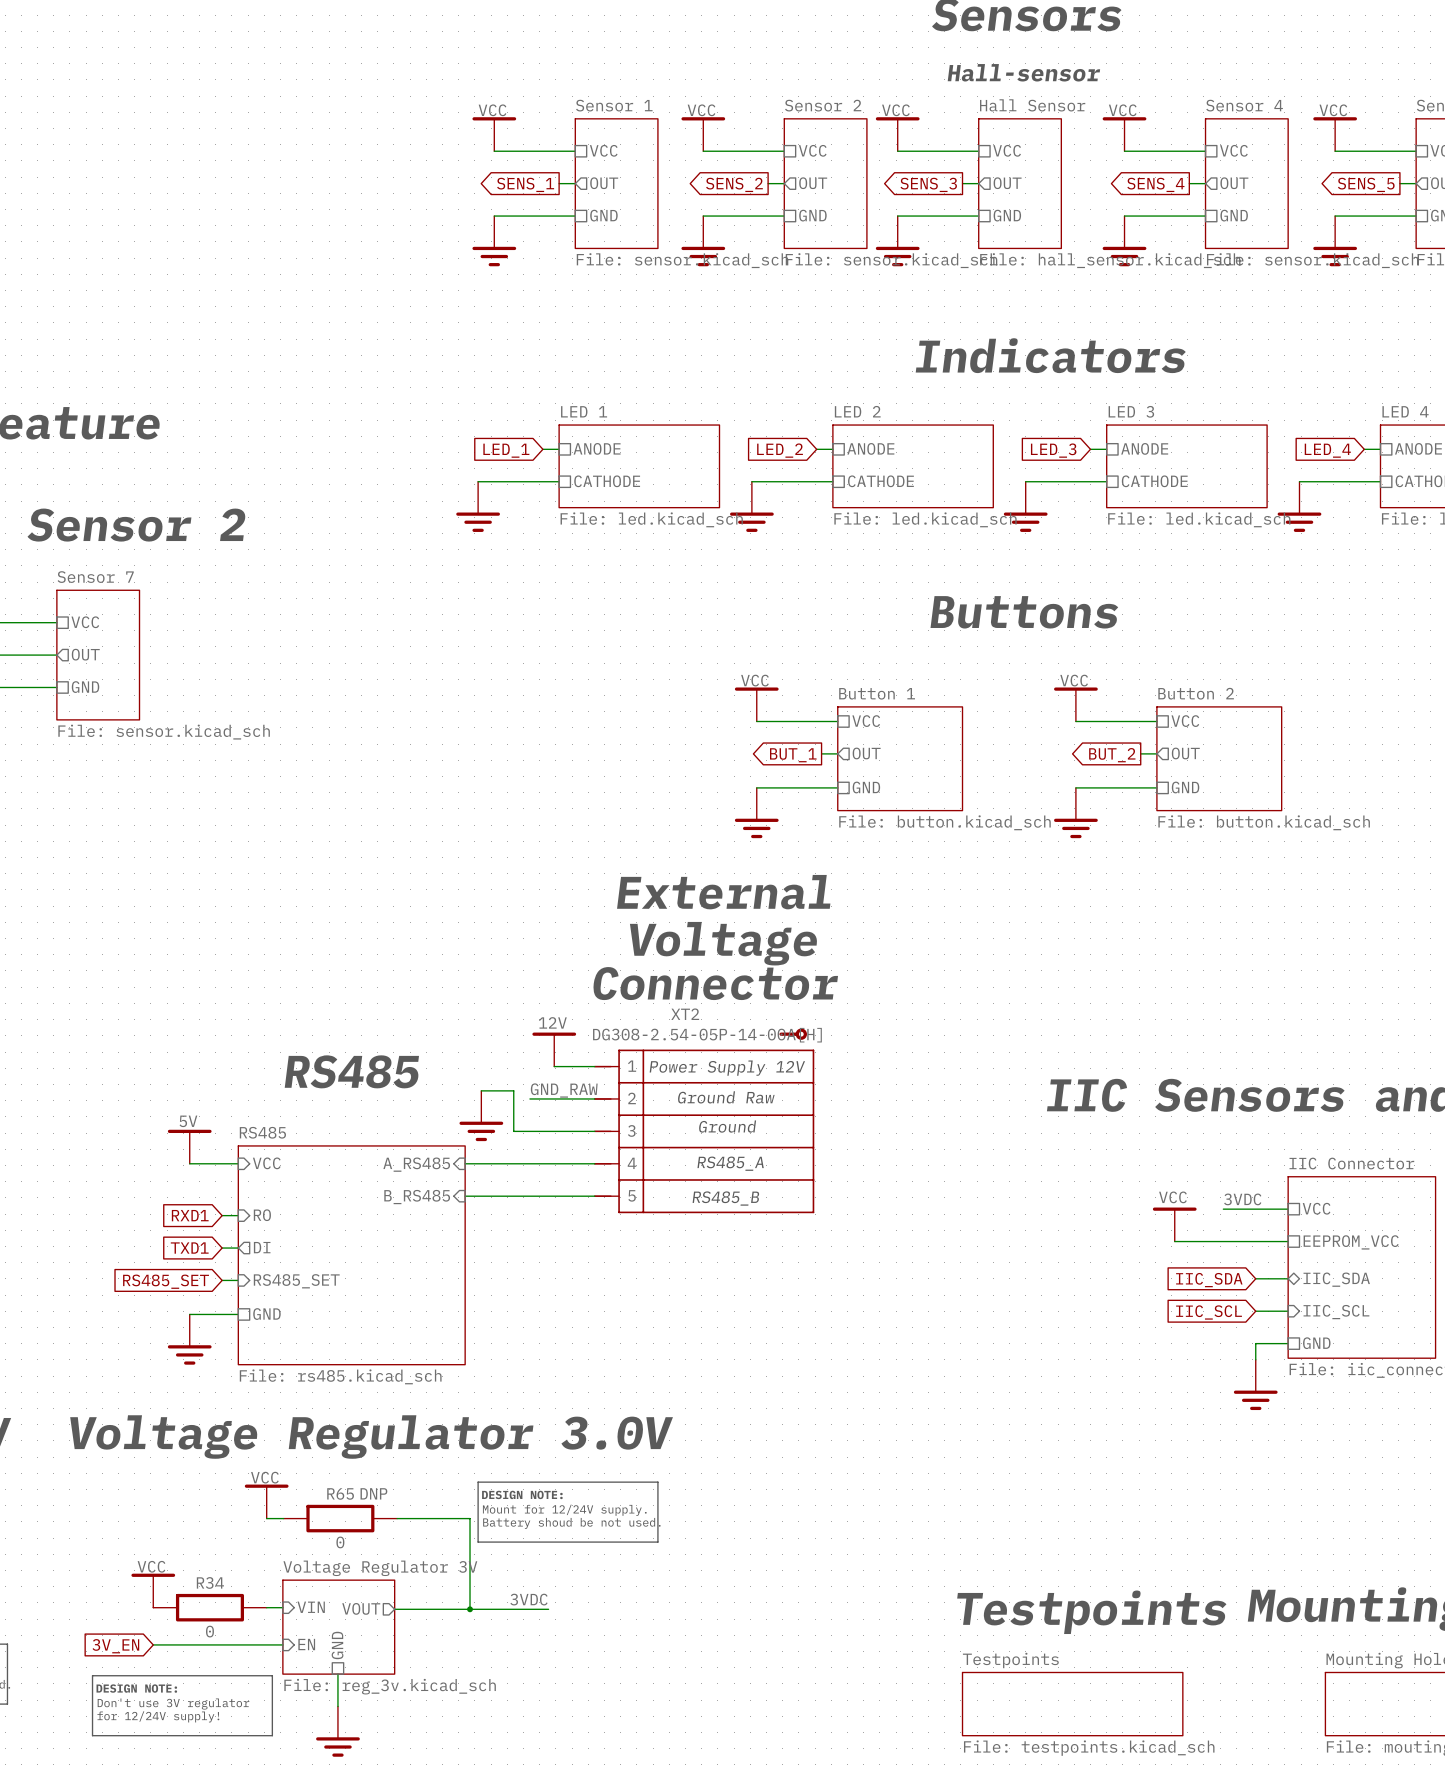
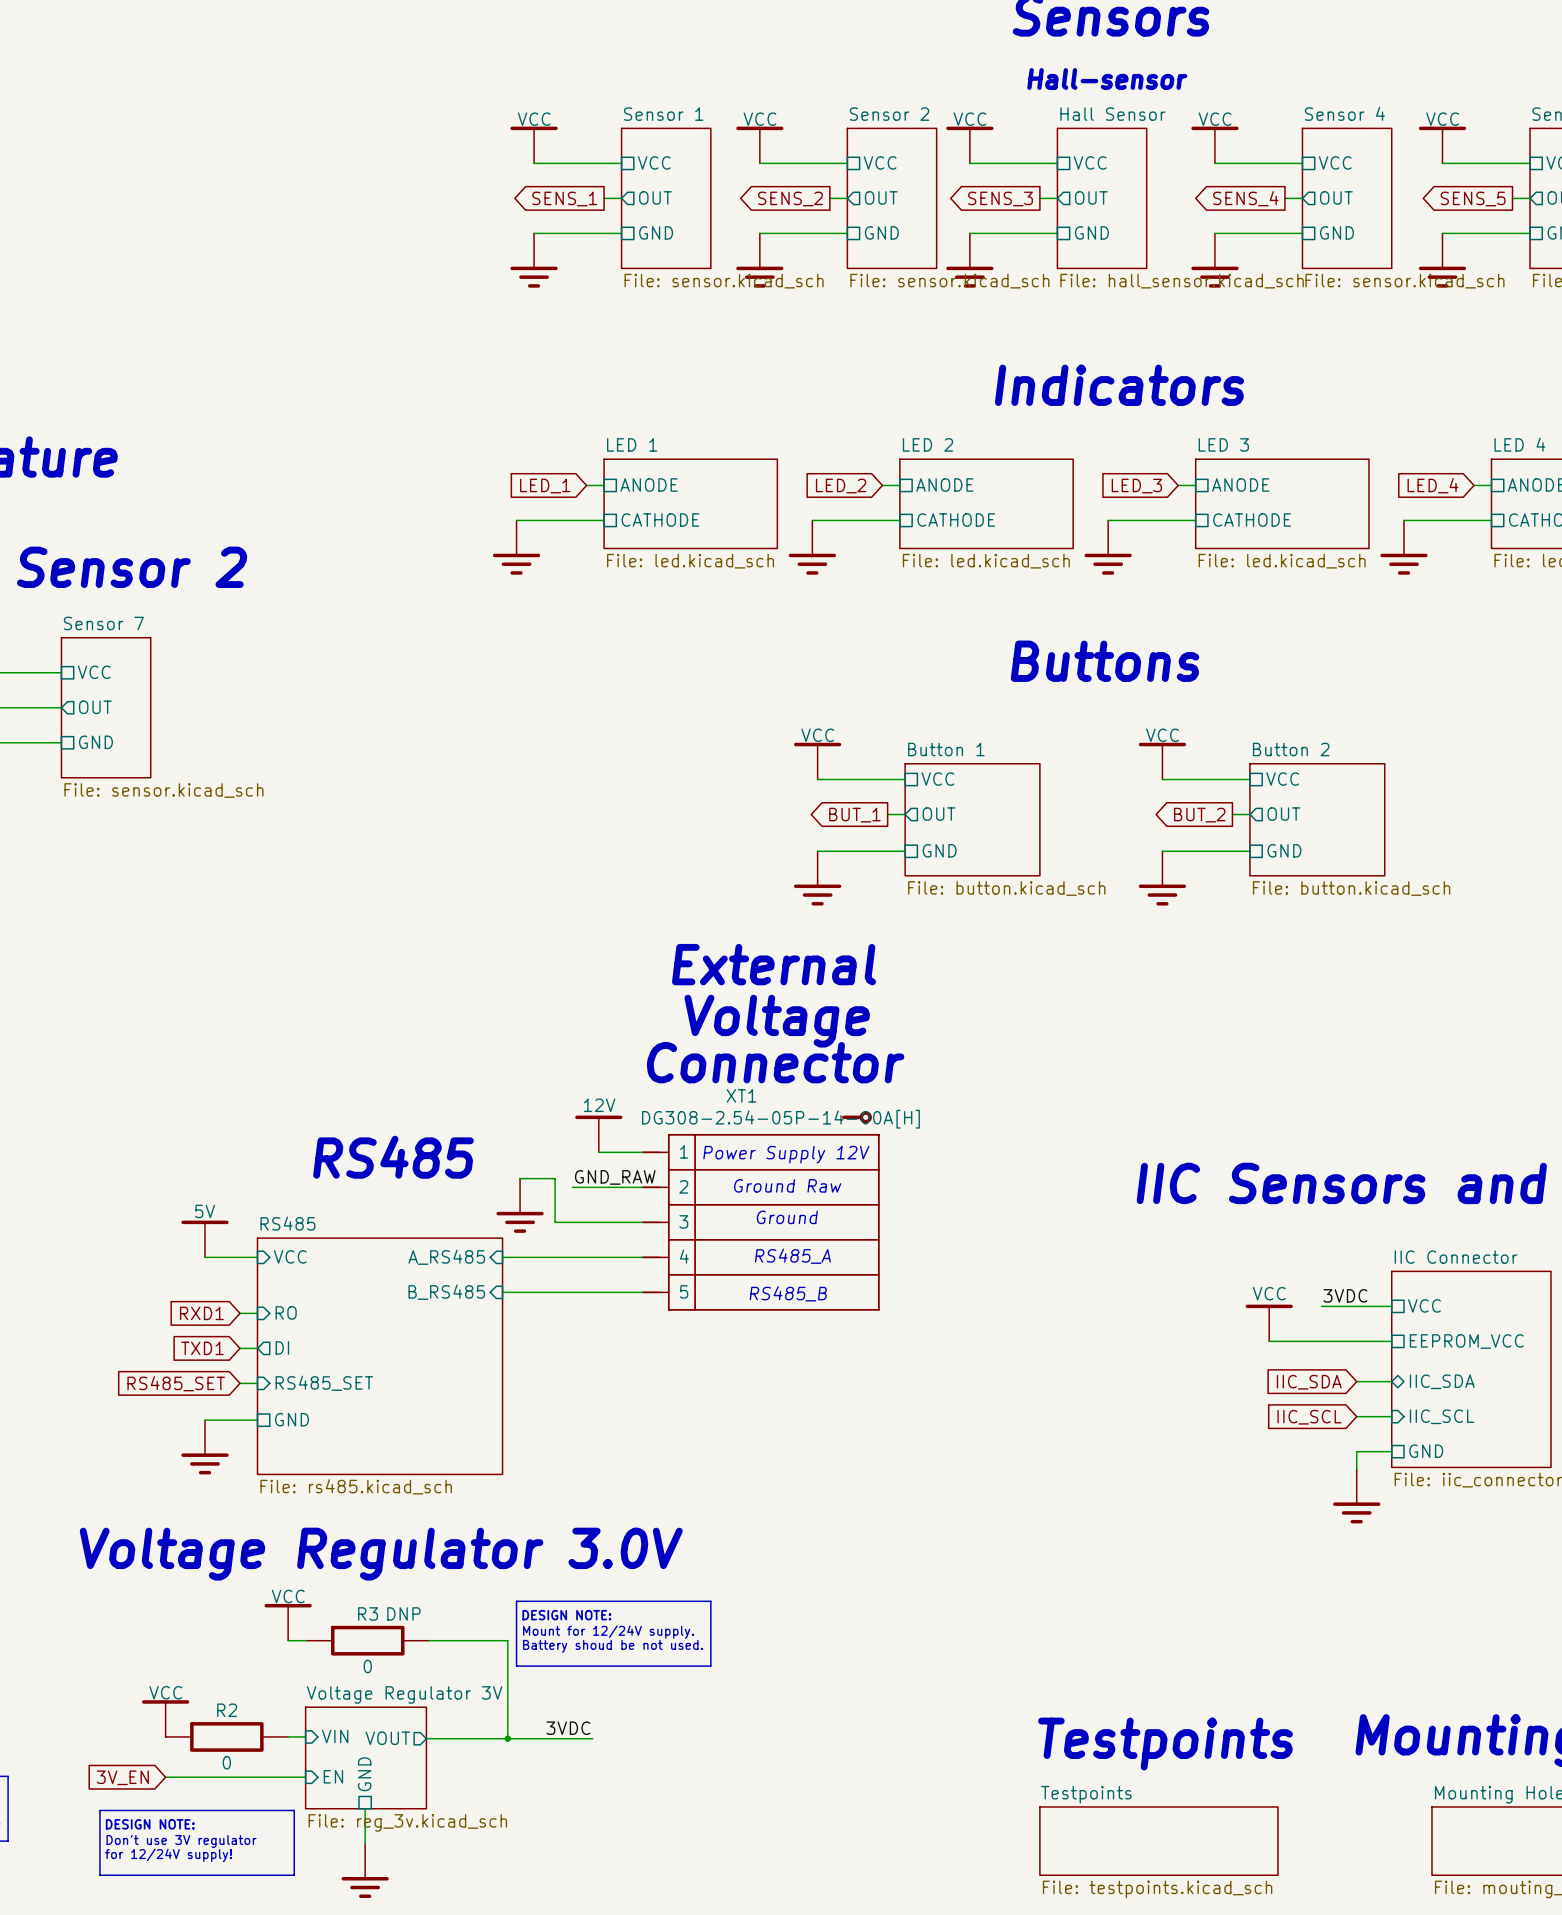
XT2 name: XT2 (685, 1014) -> XT1 (741, 1095)
R65 name: R65 (340, 1493) -> R3 (368, 1613)
R34 name: R34 (210, 1582) -> R2 (227, 1710)

